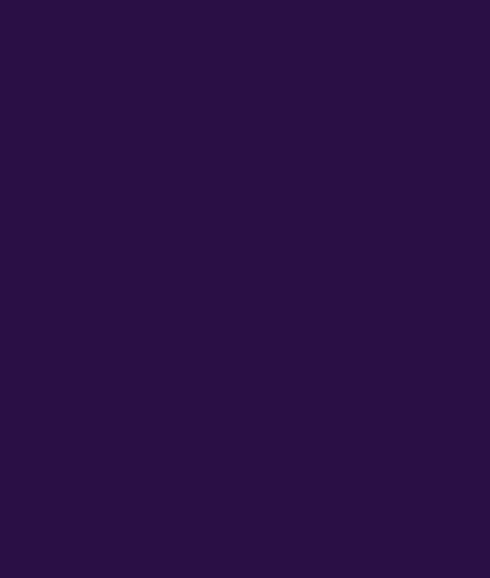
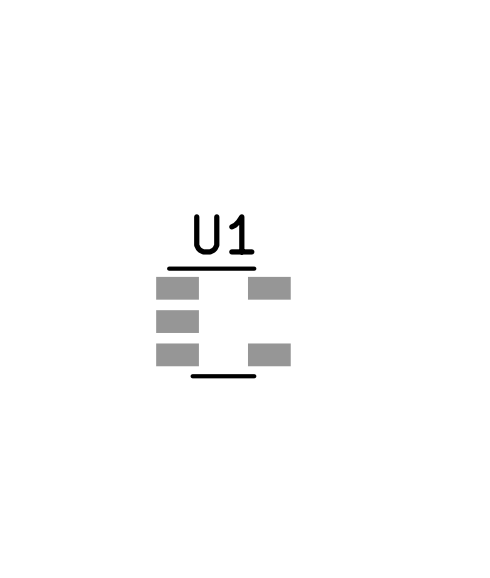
U1: none -> (223, 322)

